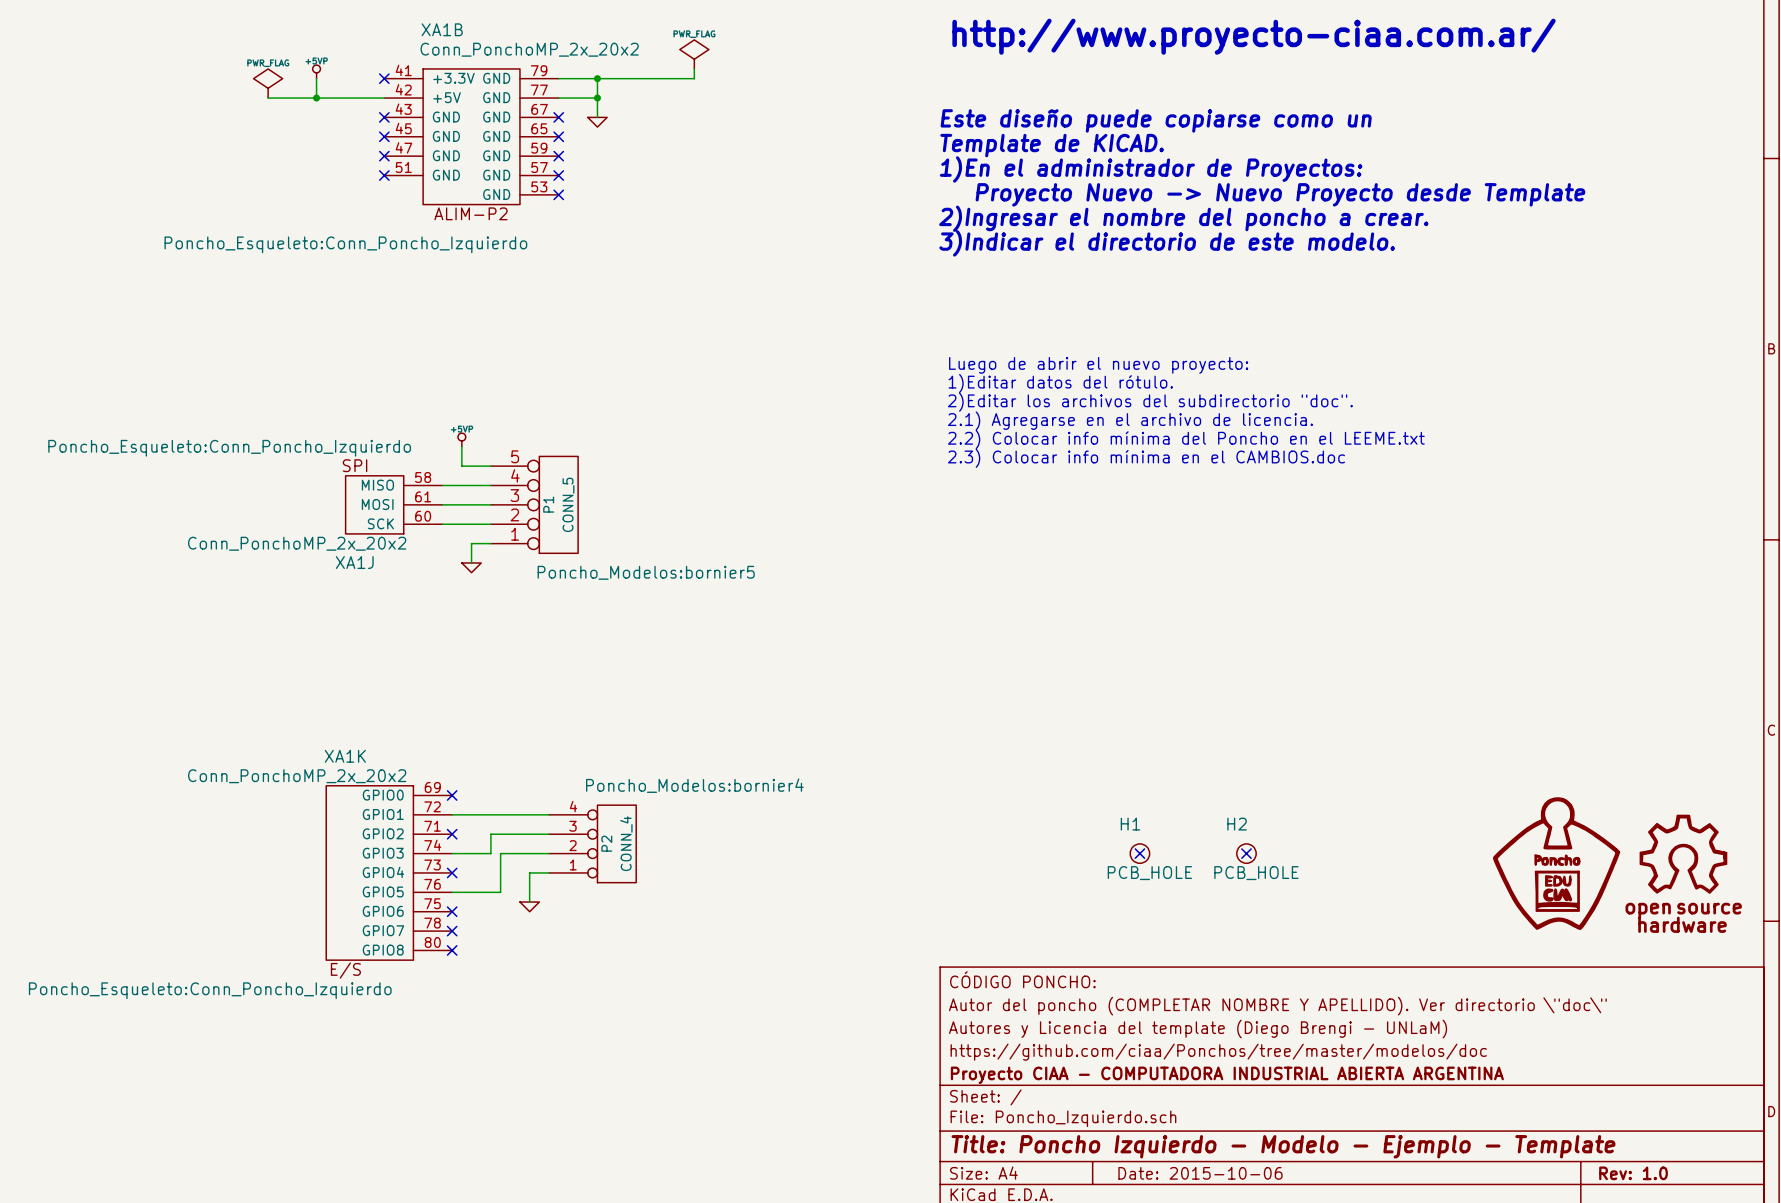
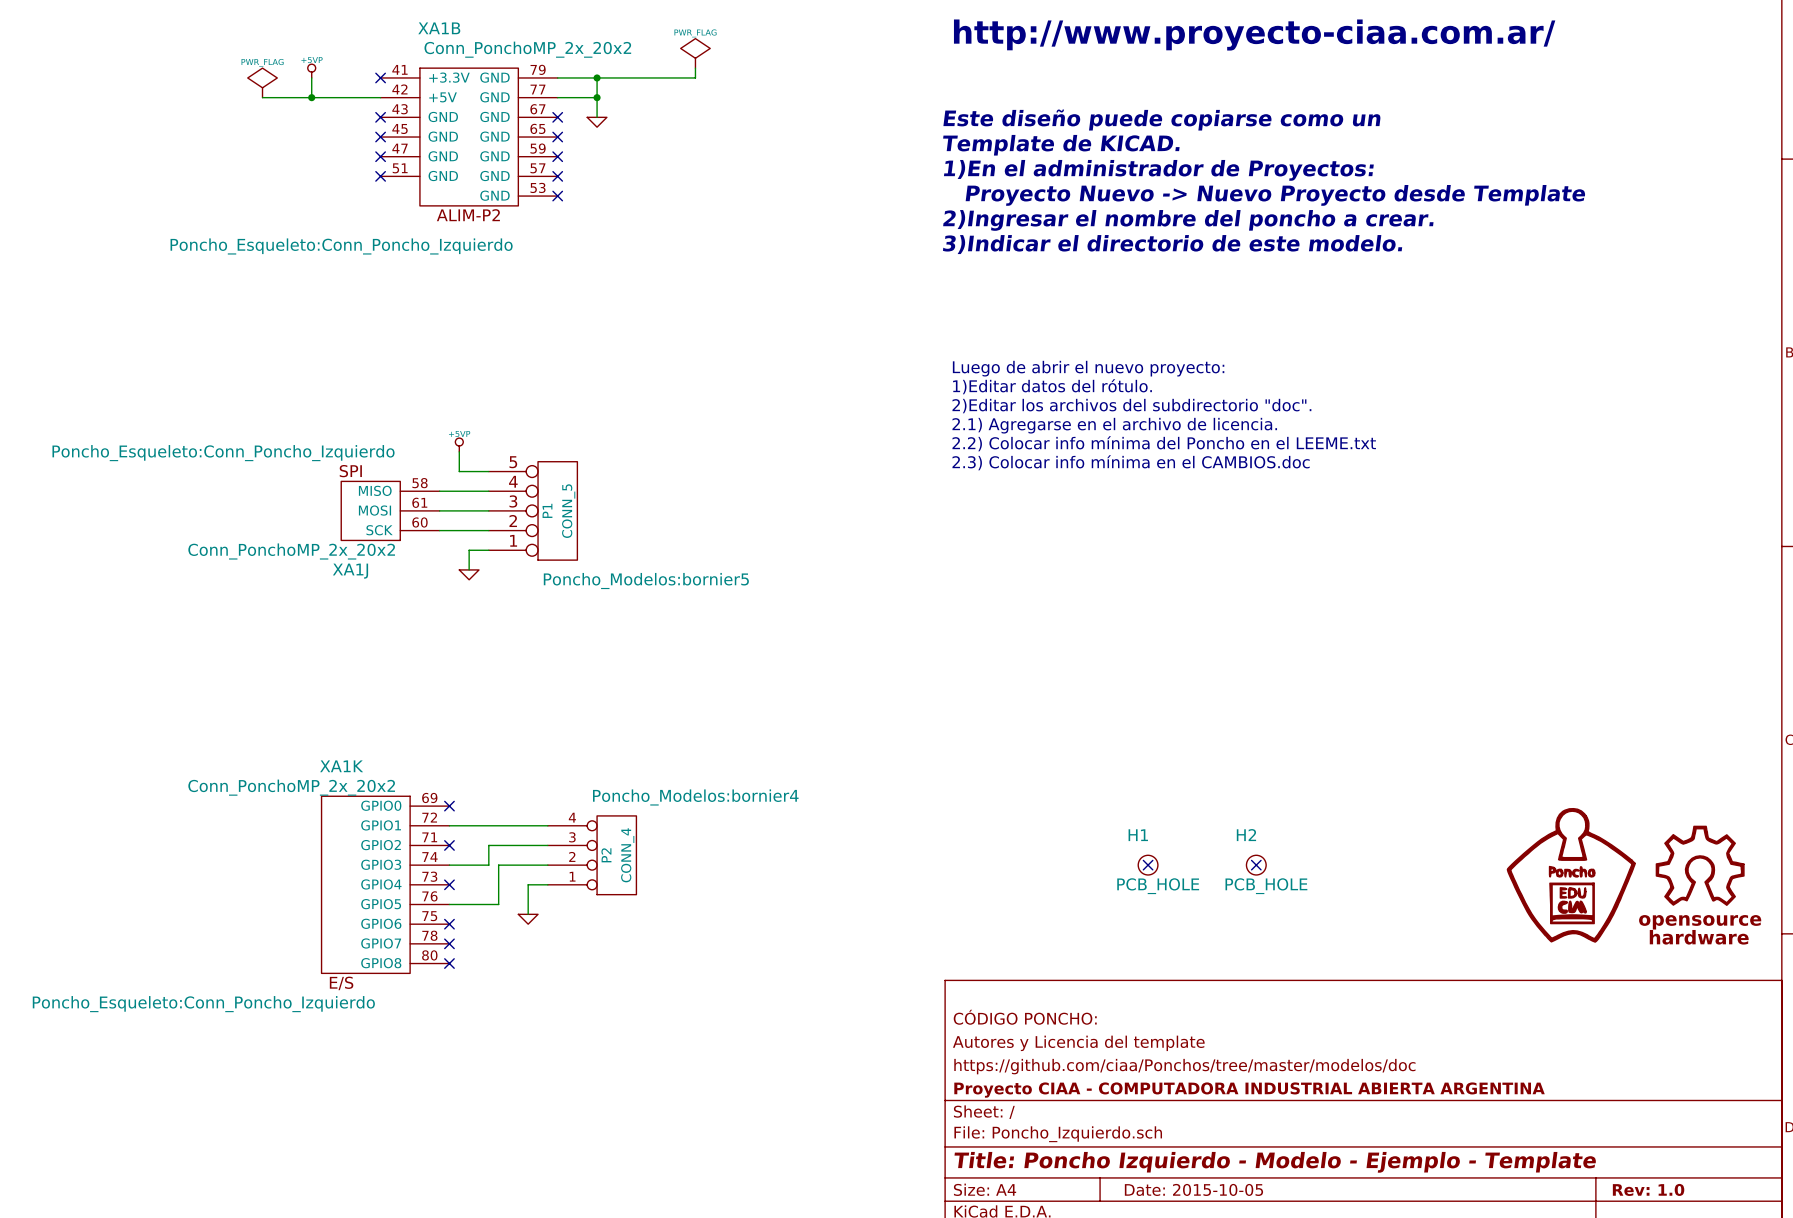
title block: CÓDIGO PONCHO: (1022, 979) -> none
title block: Autor del poncho (COMPLETAR NOMBRE Y APELLIDO). Ver directorio \"doc\" (1277, 1006) -> CÓDIGO PONCHO: (1025, 1017)
title block: Autores y Licencia del template (Diego Brengi - UNLaM) (1198, 1029) -> Autores y Licencia del template (1078, 1043)
title block: Date: 2015-10-06 (1200, 1173) -> Date: 2015-10-05 (1193, 1189)

